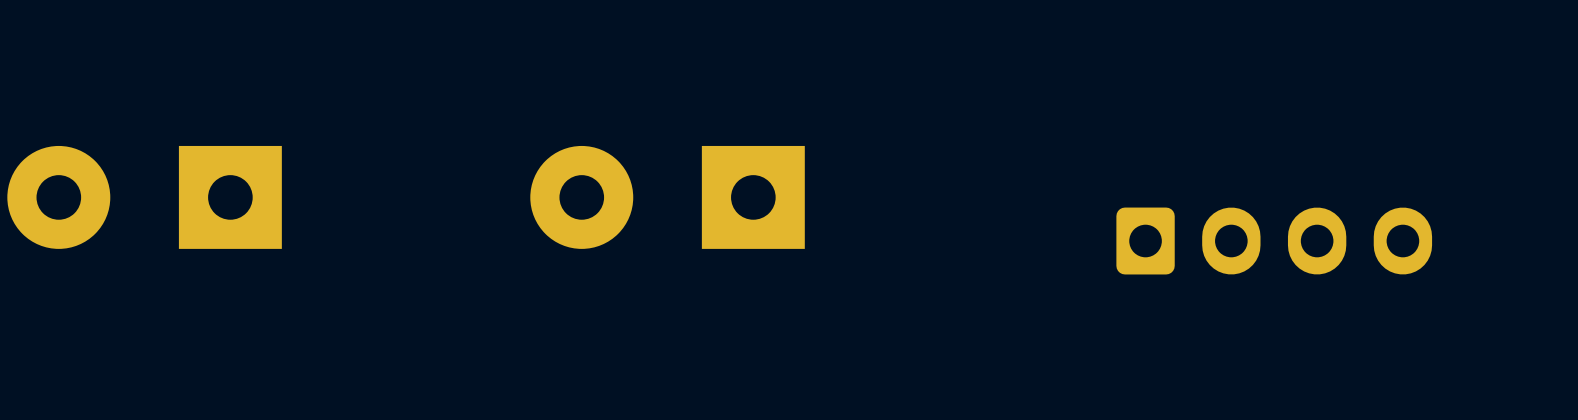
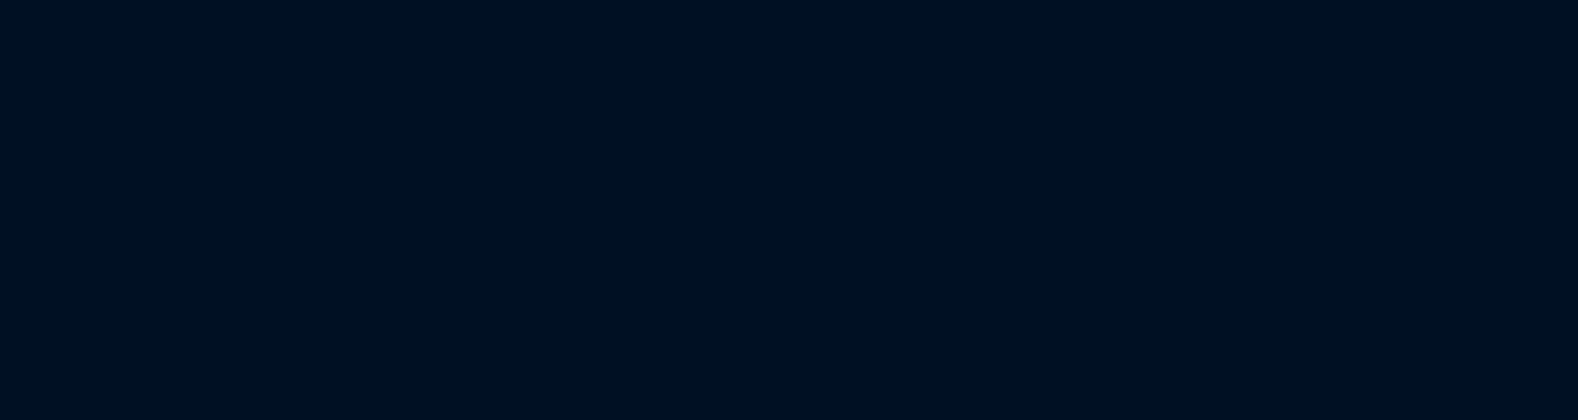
part: (144, 197) -> none
part: (667, 197) -> none
part: (1274, 241) -> none

